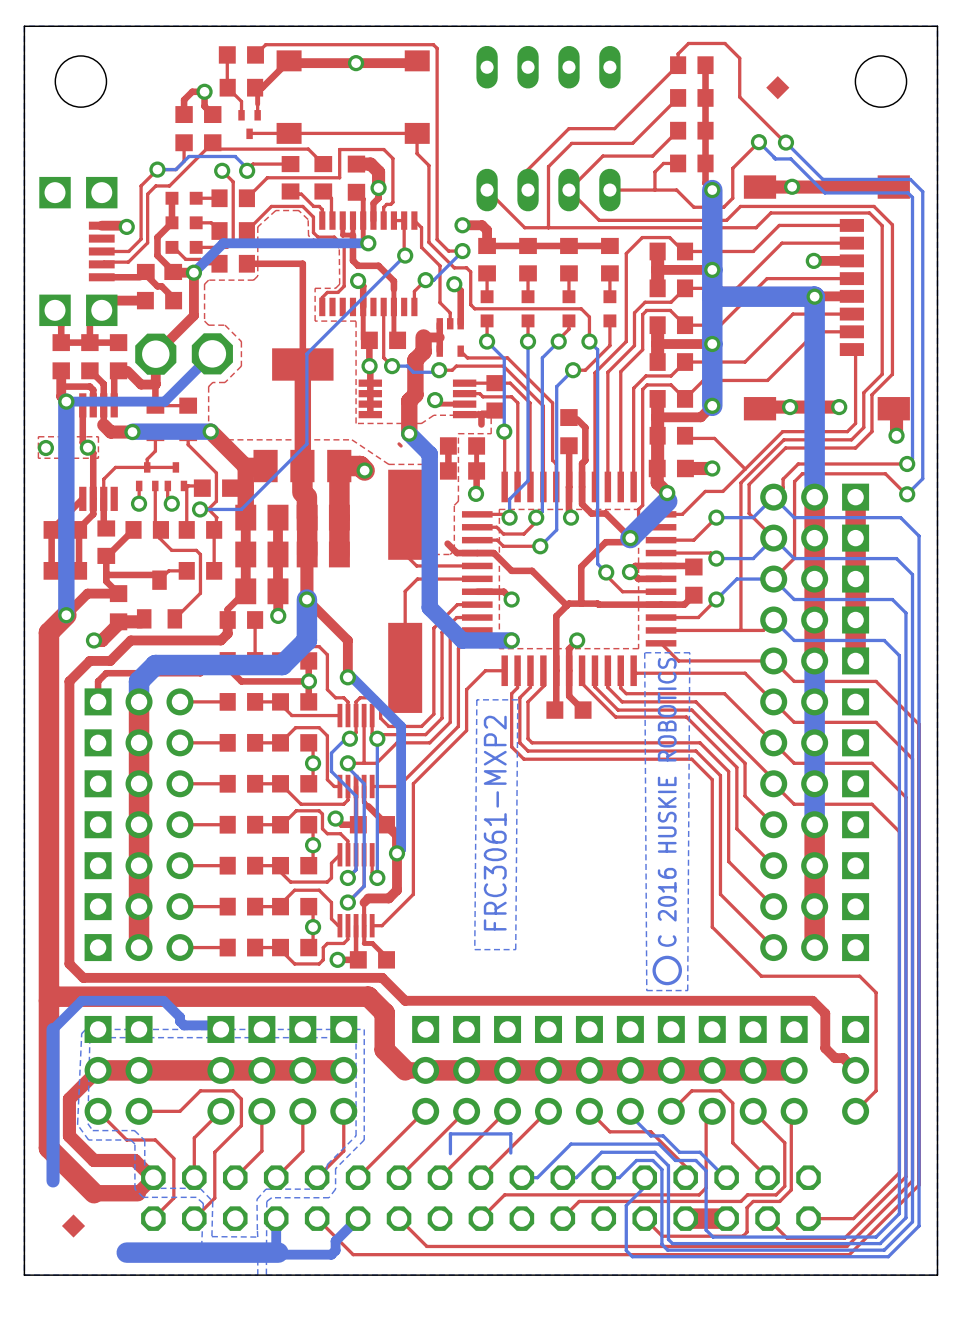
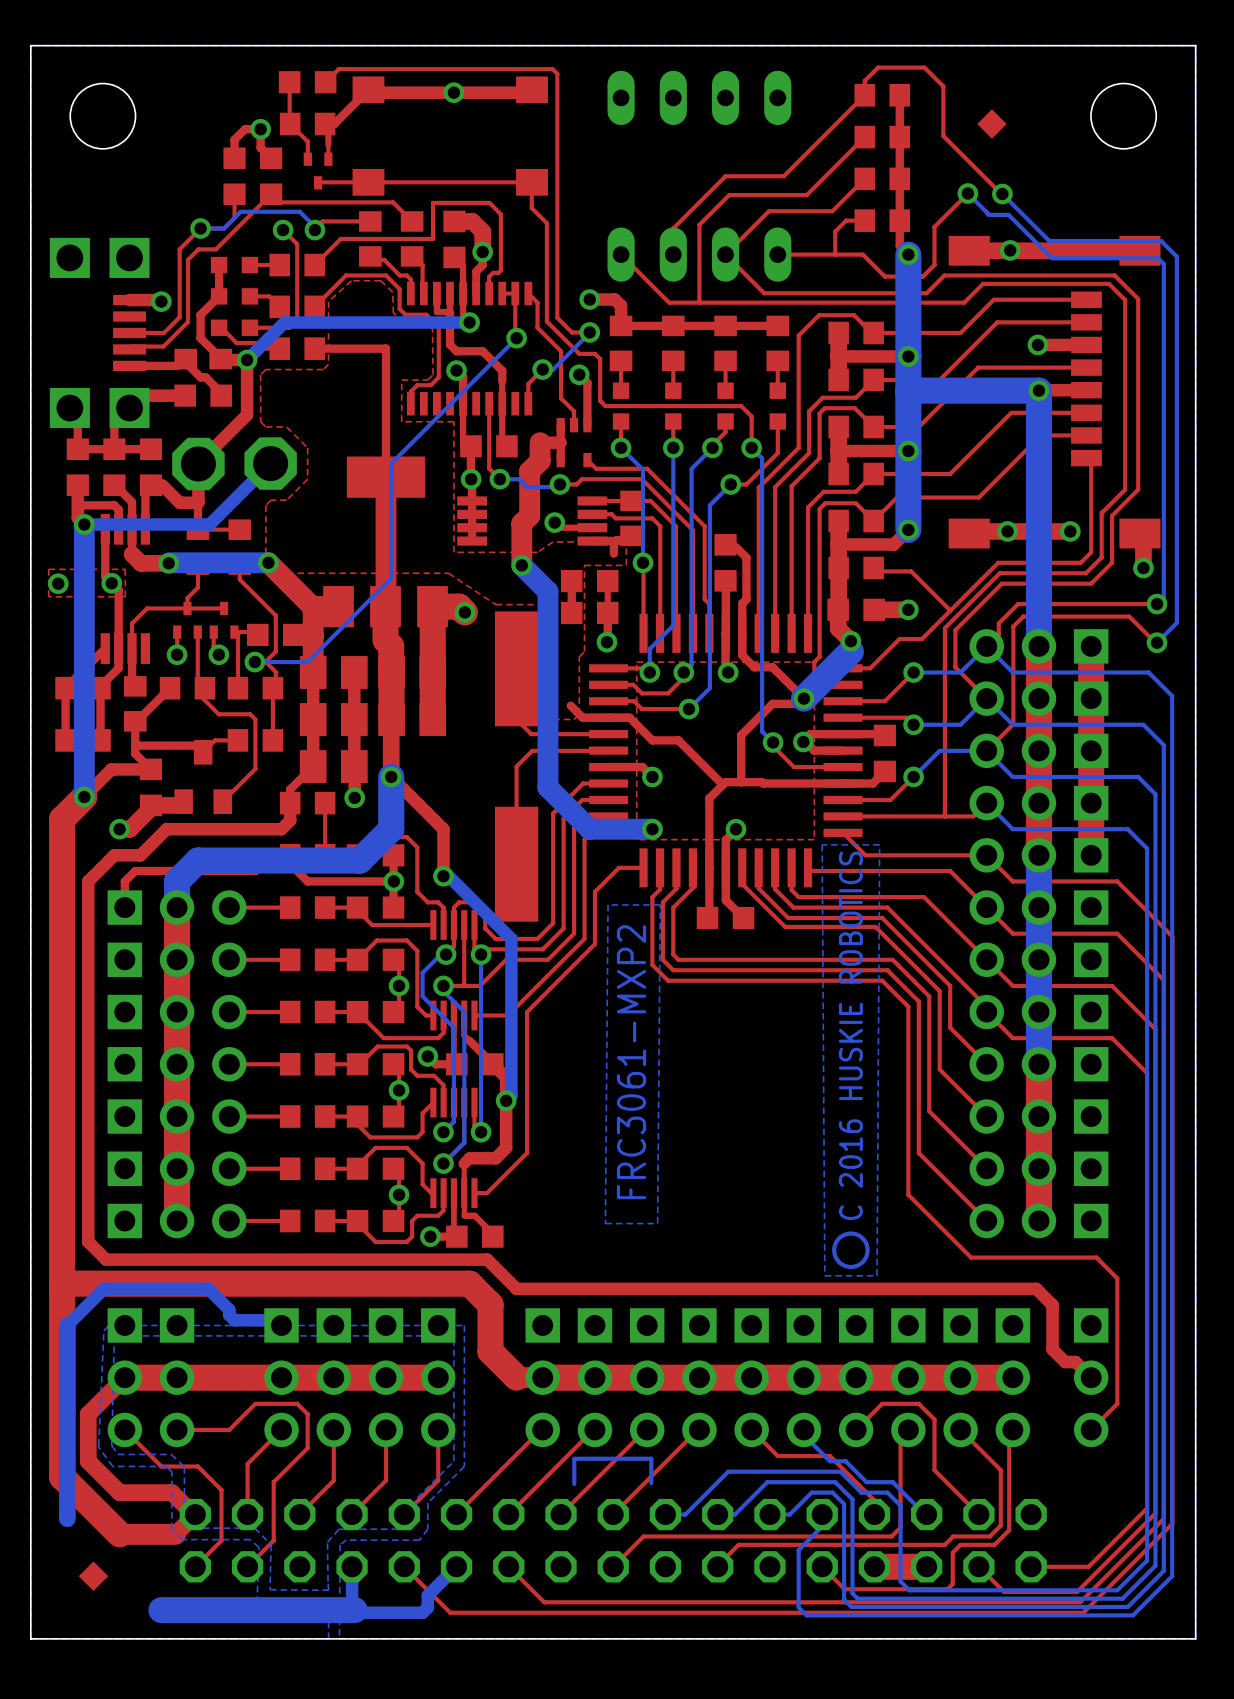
top track: (399, 443) (401, 445) -> none

